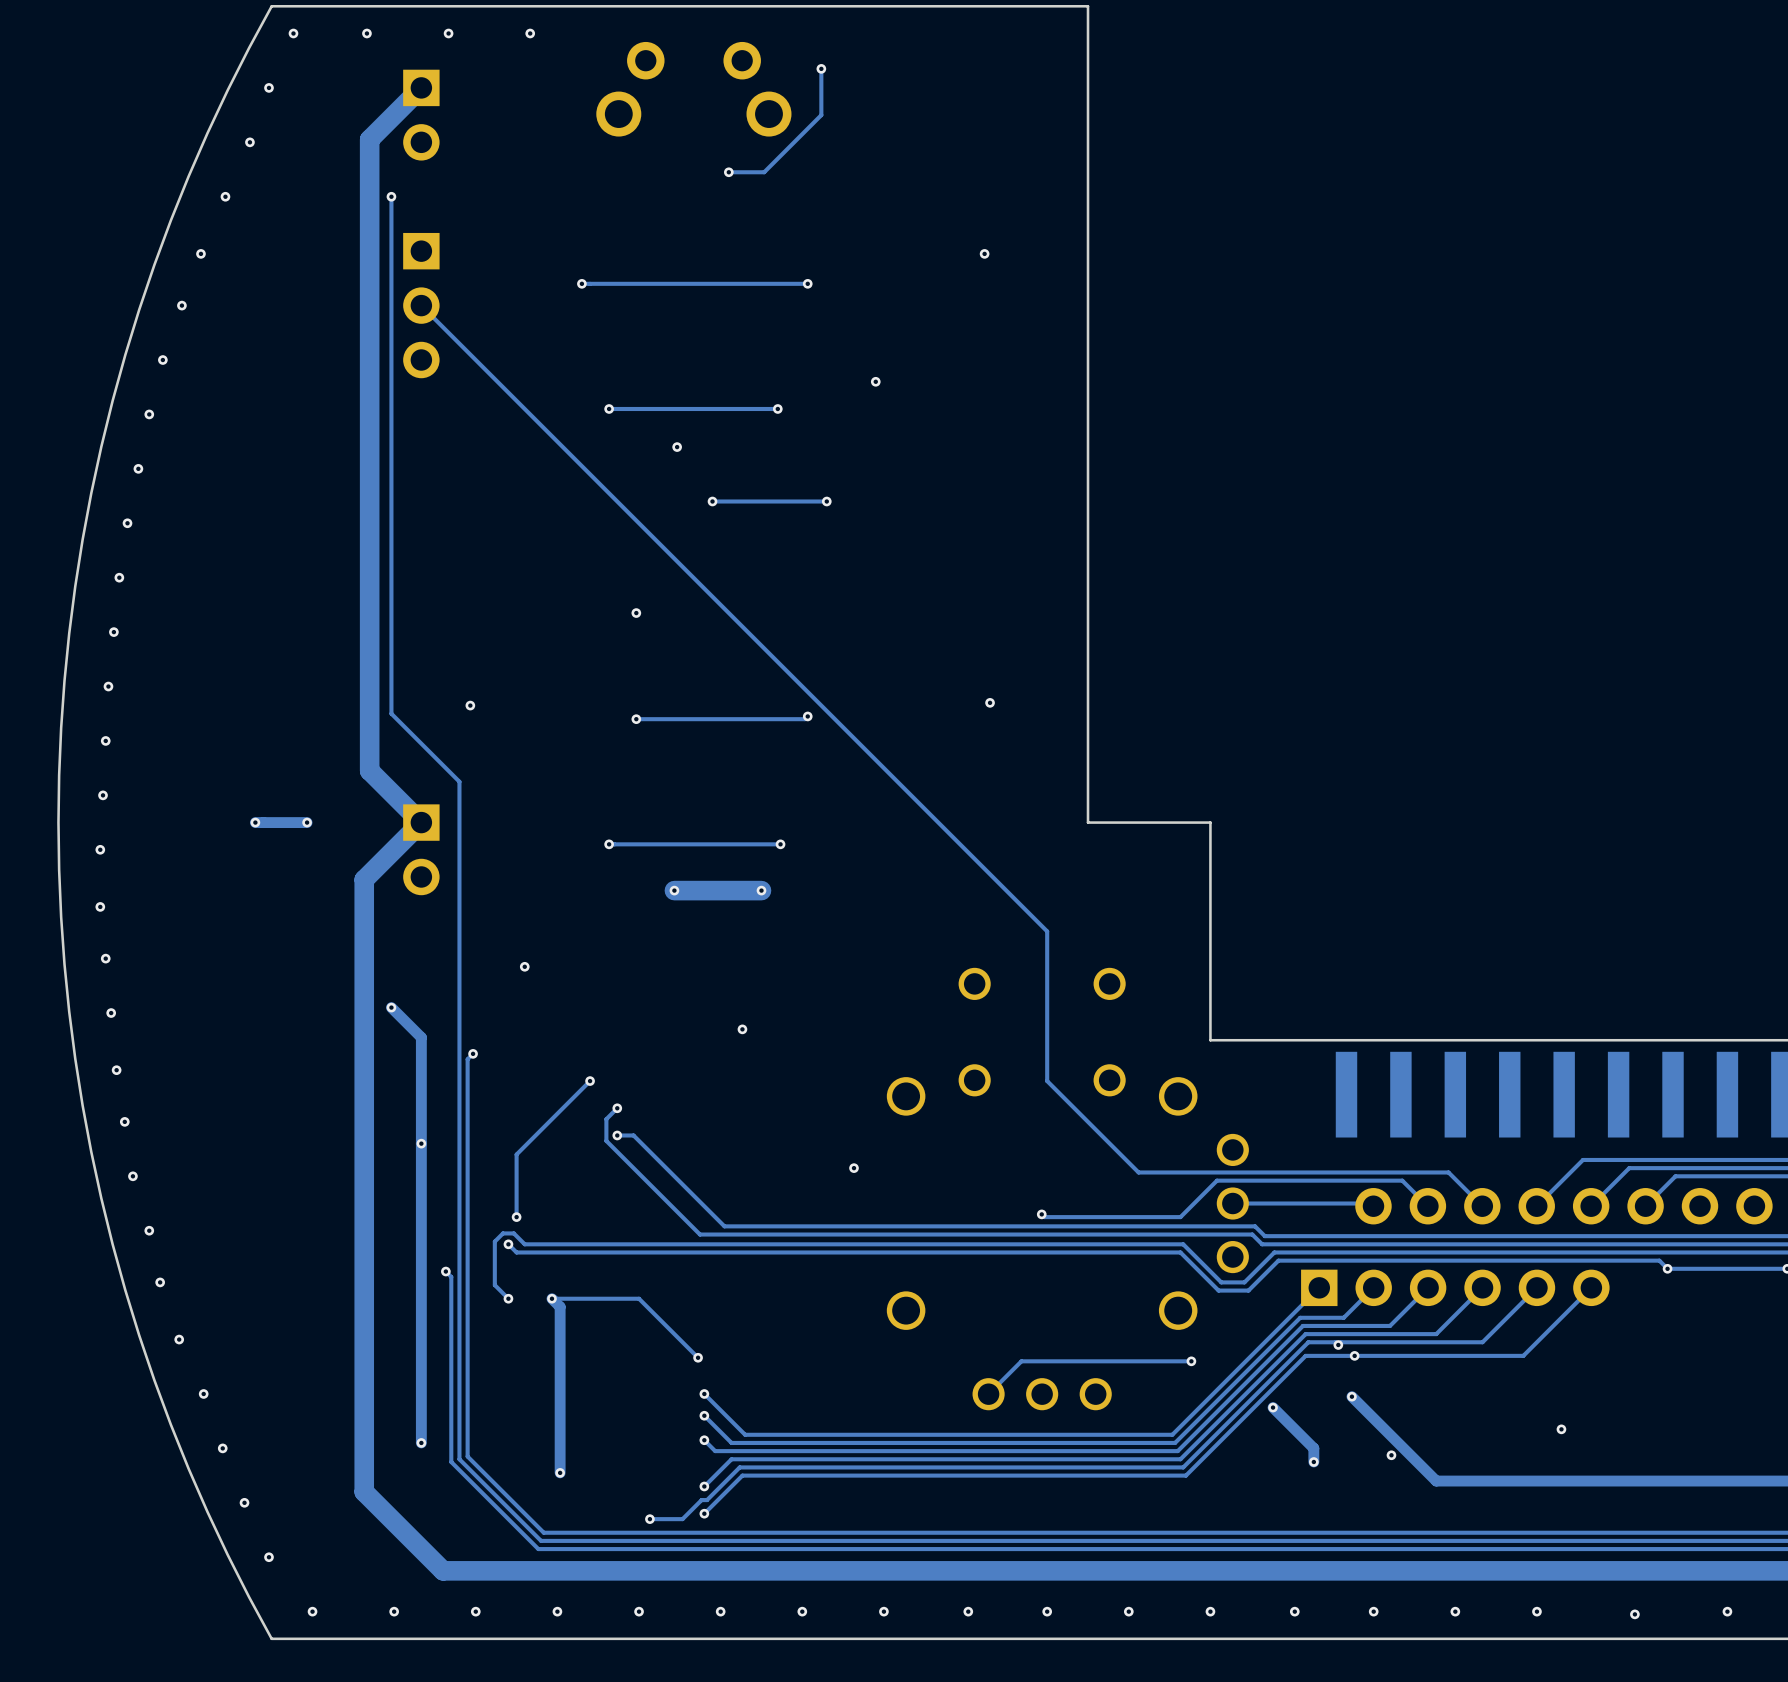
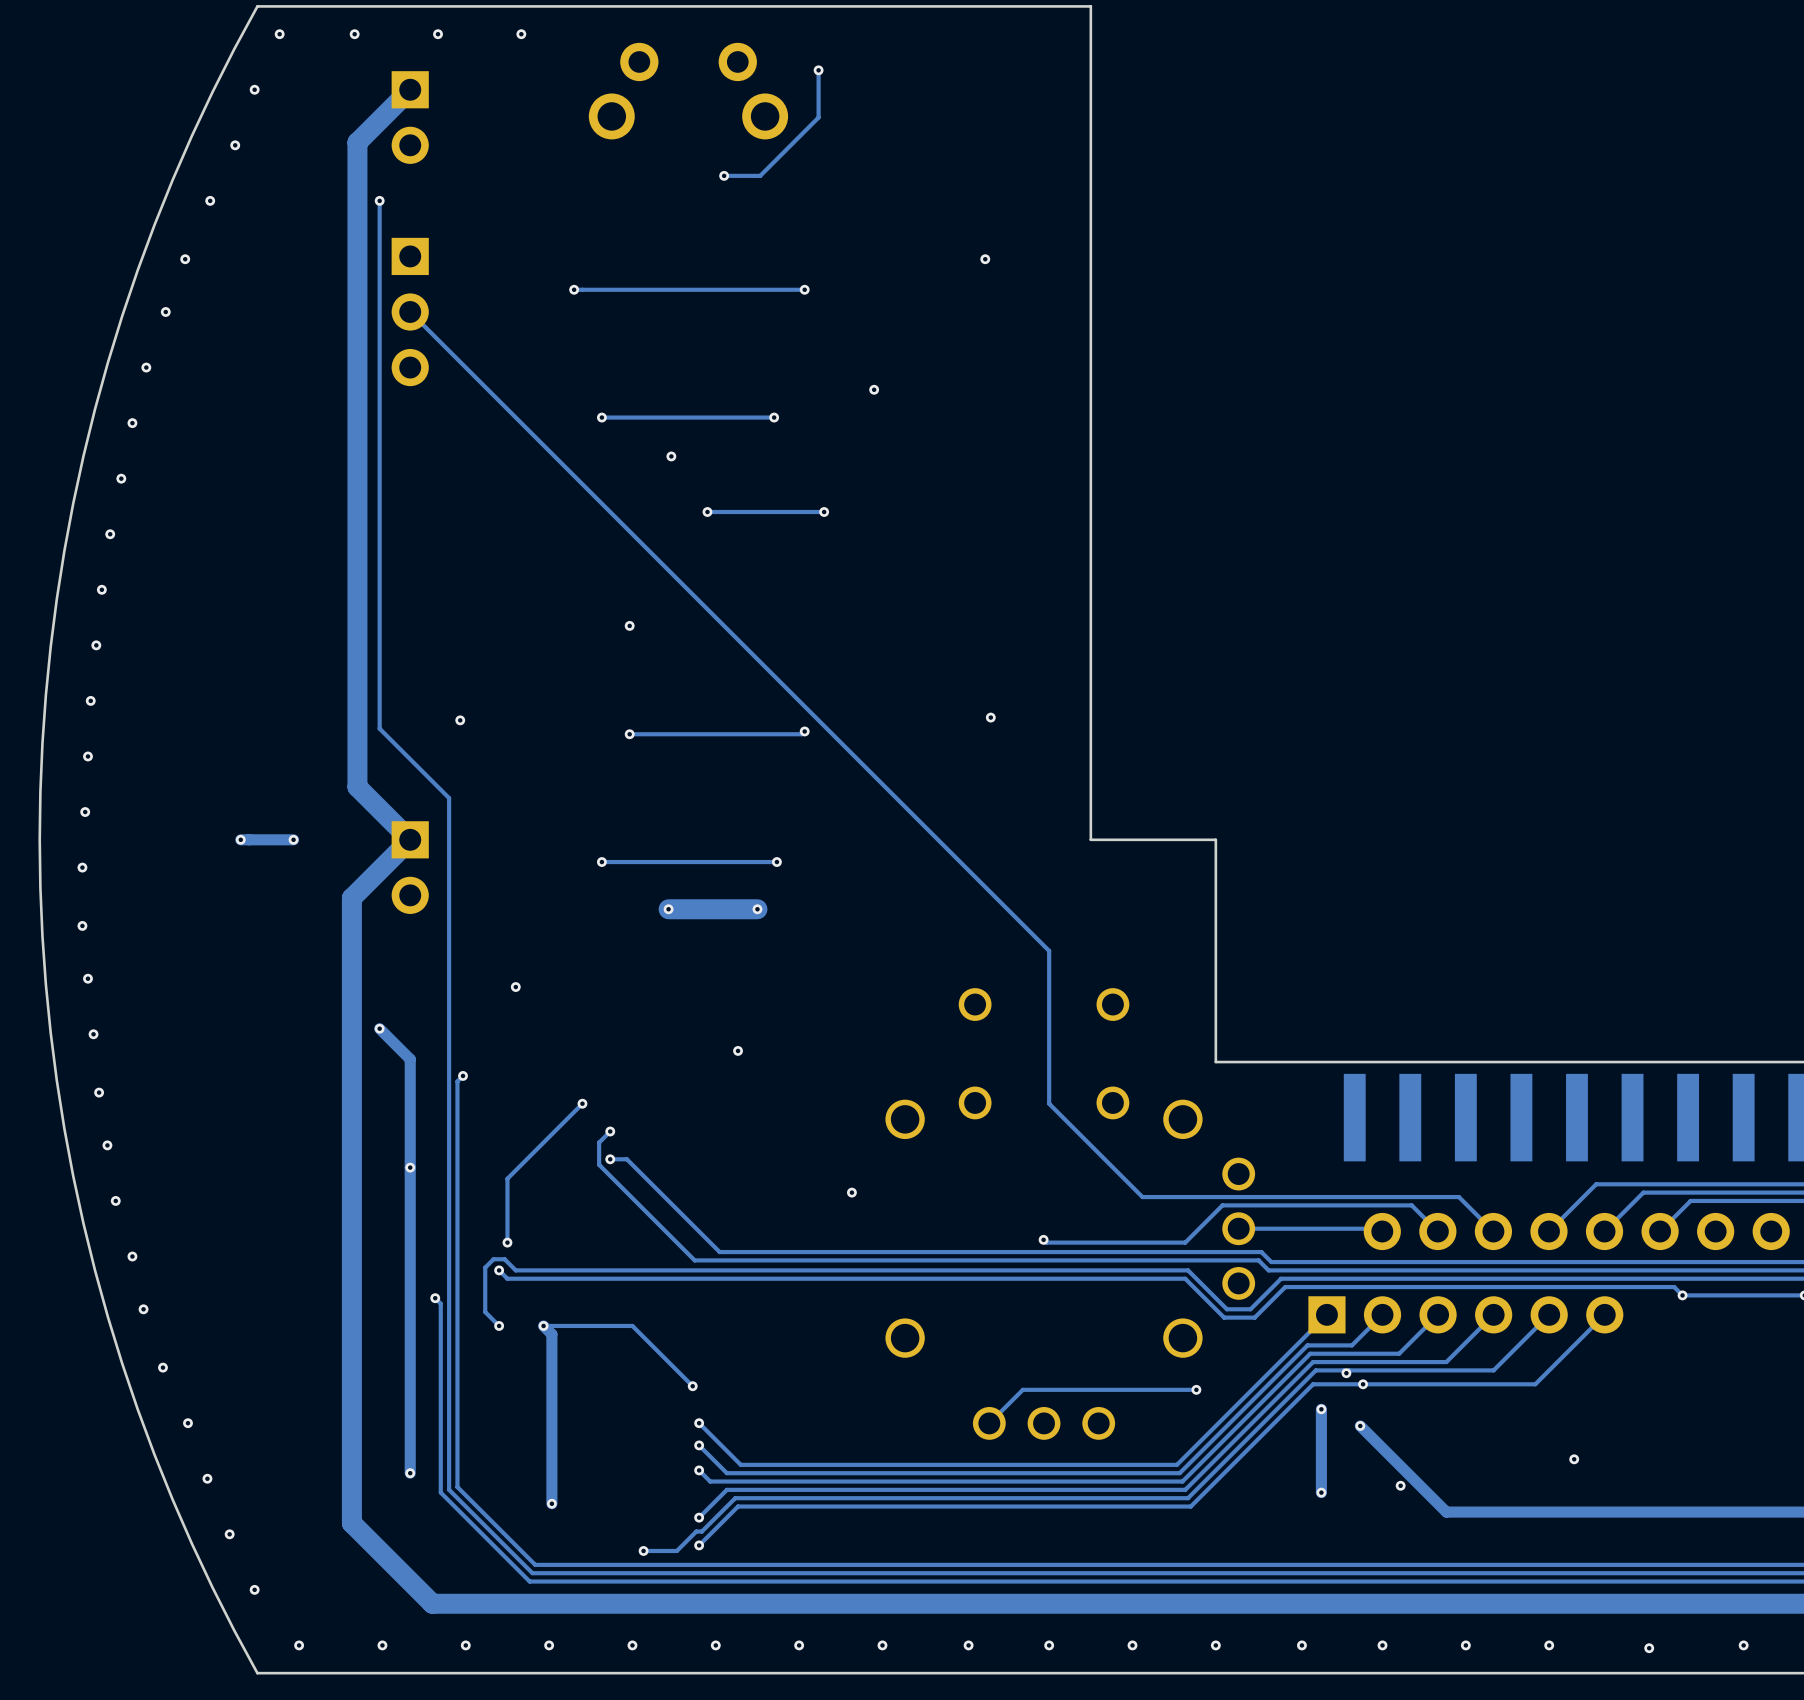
track: (1273, 1407) (1313, 1448) -> (1321, 1409) (1321, 1478)
via position: (1273, 1407) -> (1321, 1409)

